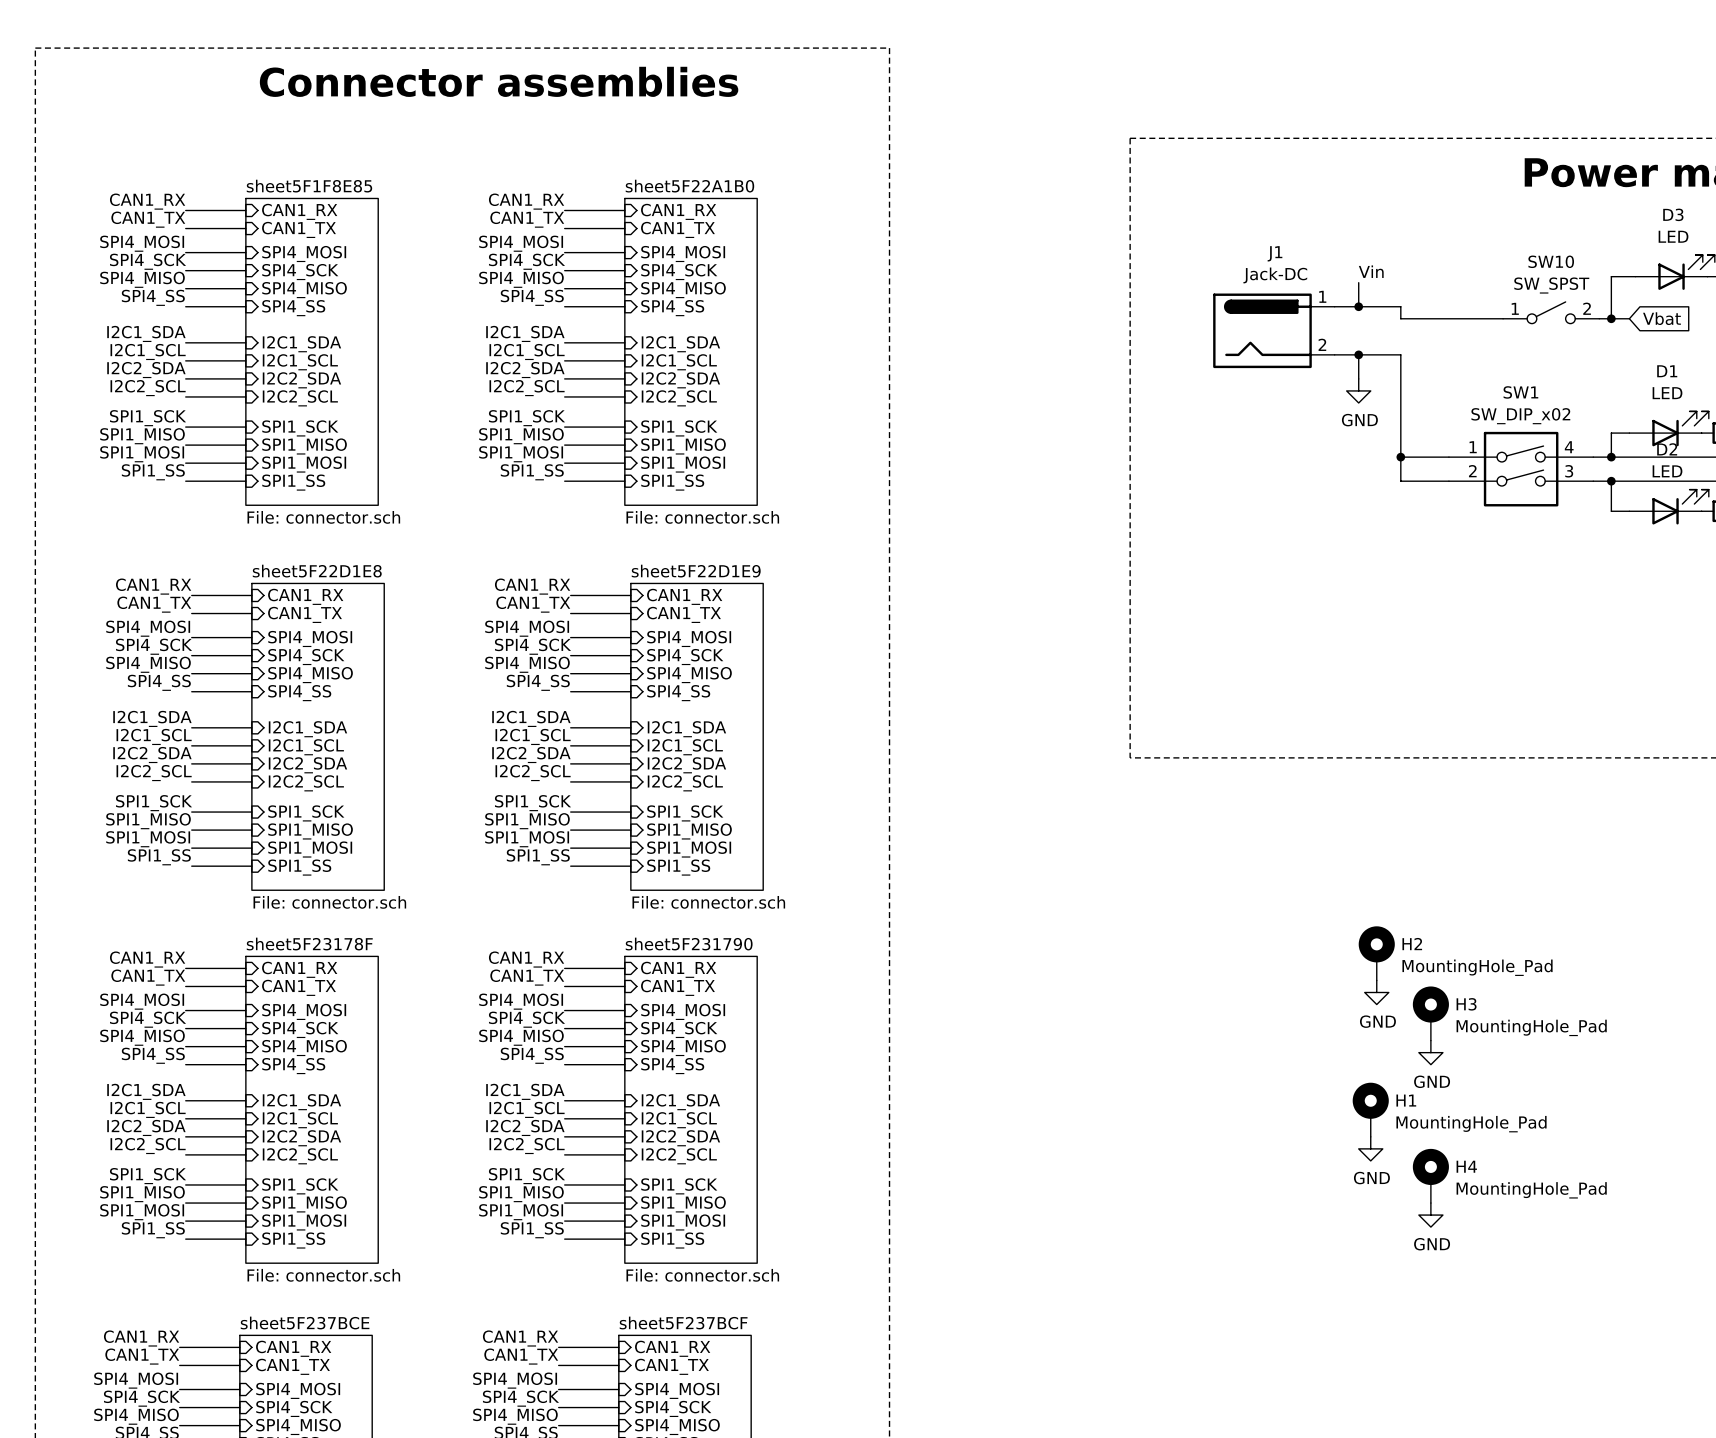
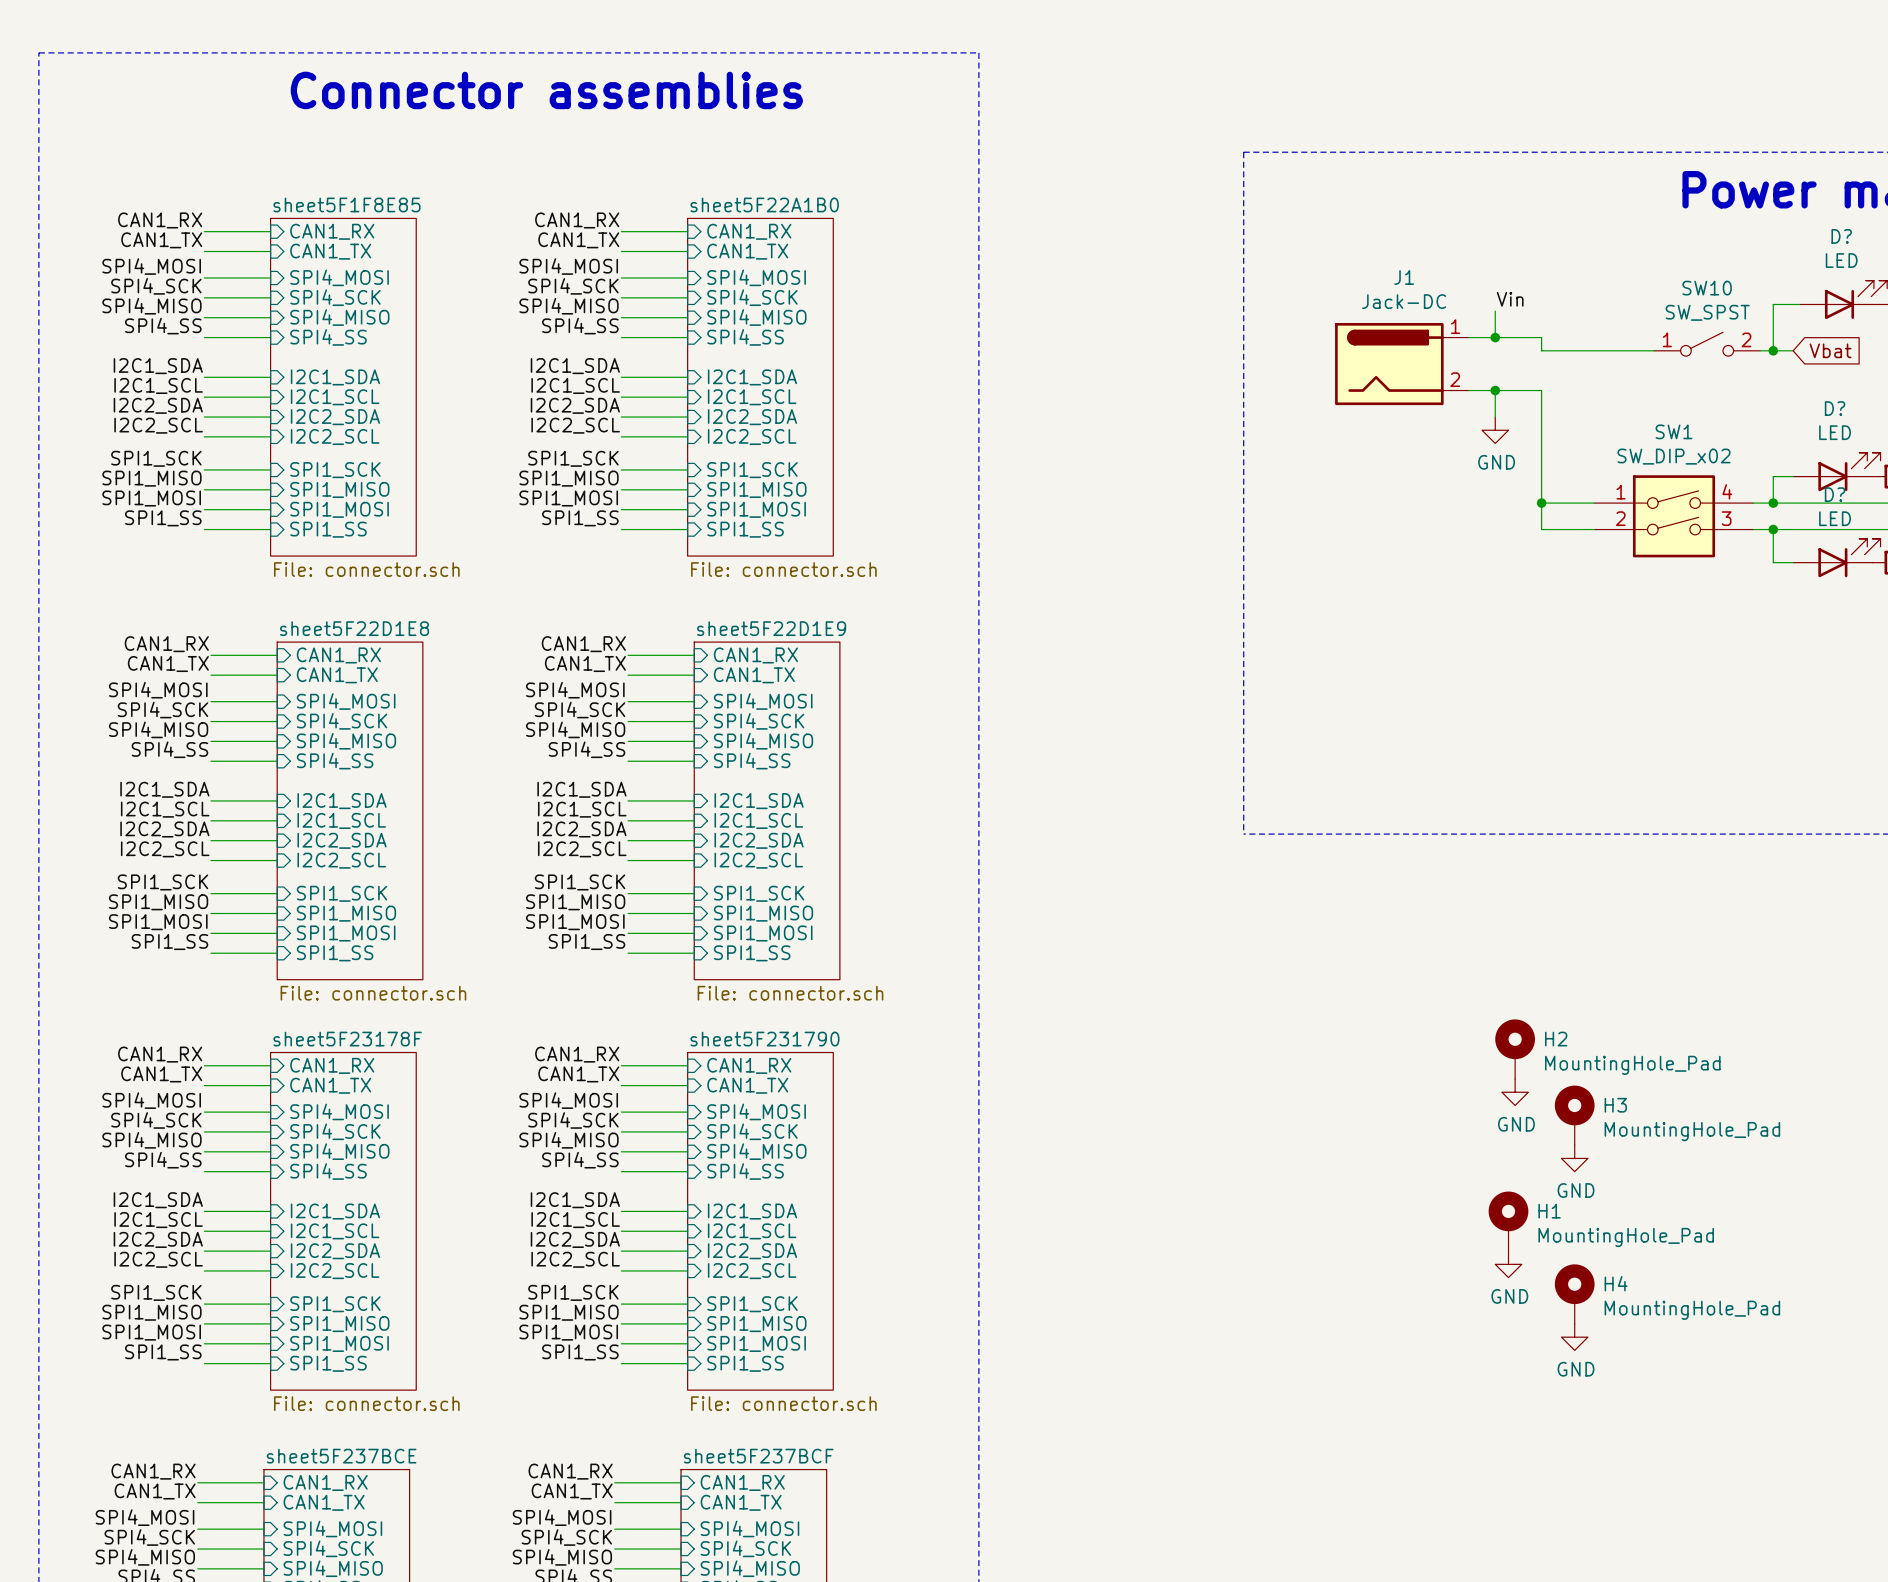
D3 name: D3 (1673, 214) -> D? (1841, 236)
D1 name: D1 (1667, 371) -> D? (1835, 408)
D2 name: D2 (1667, 449) -> D? (1835, 494)

